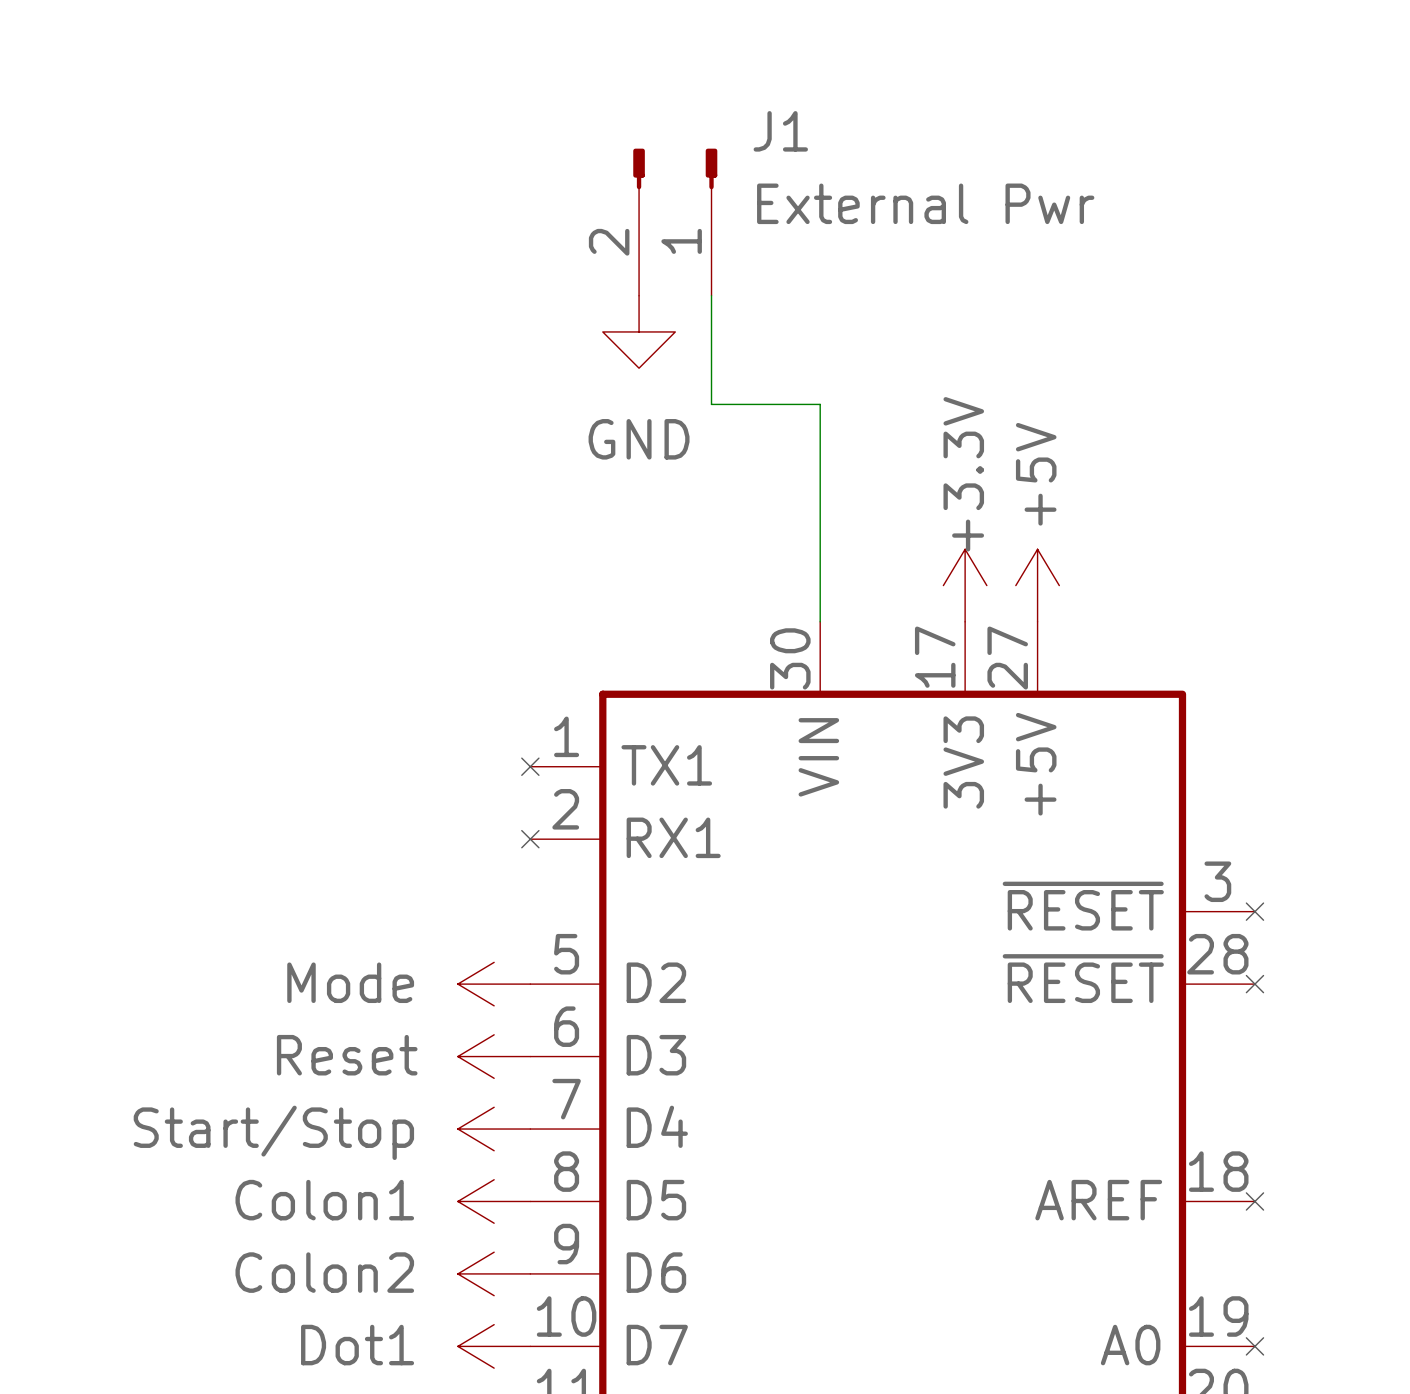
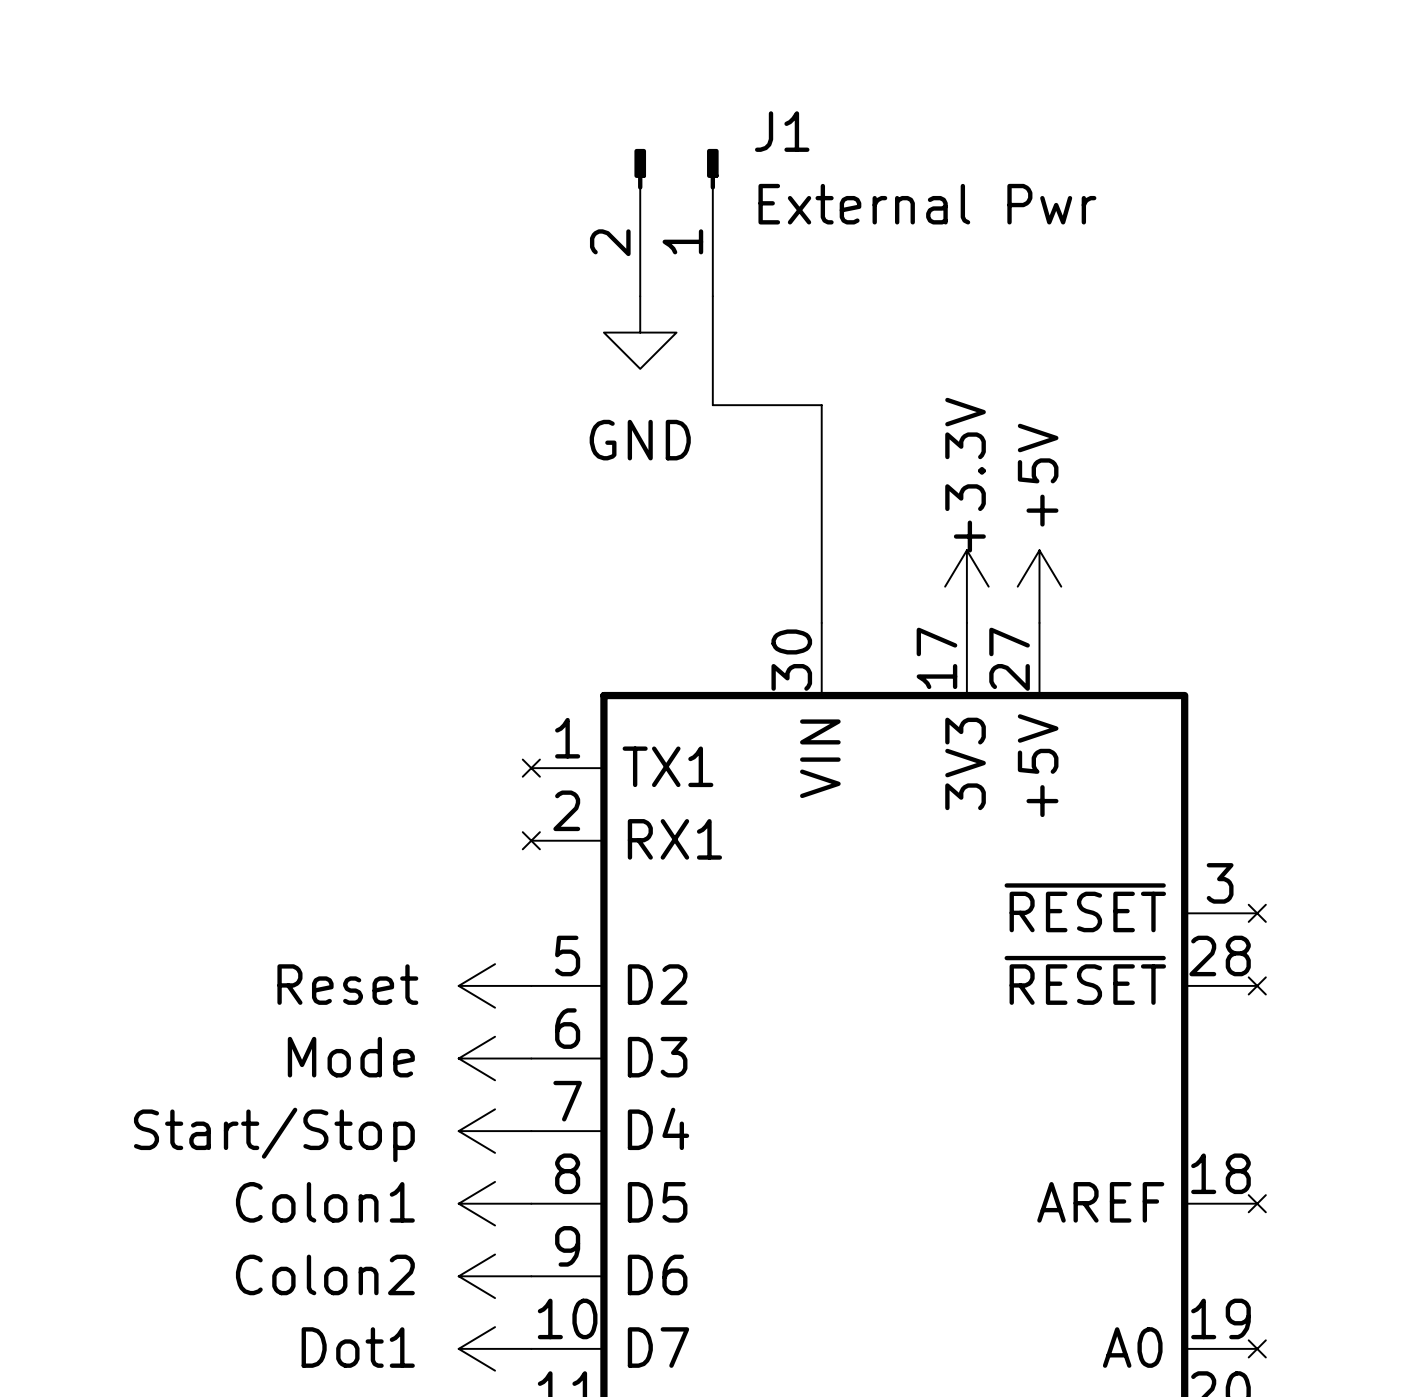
power symbol: Mode (494, 984) -> Reset (495, 985)
power symbol: Reset (494, 1056) -> Mode (495, 1058)

